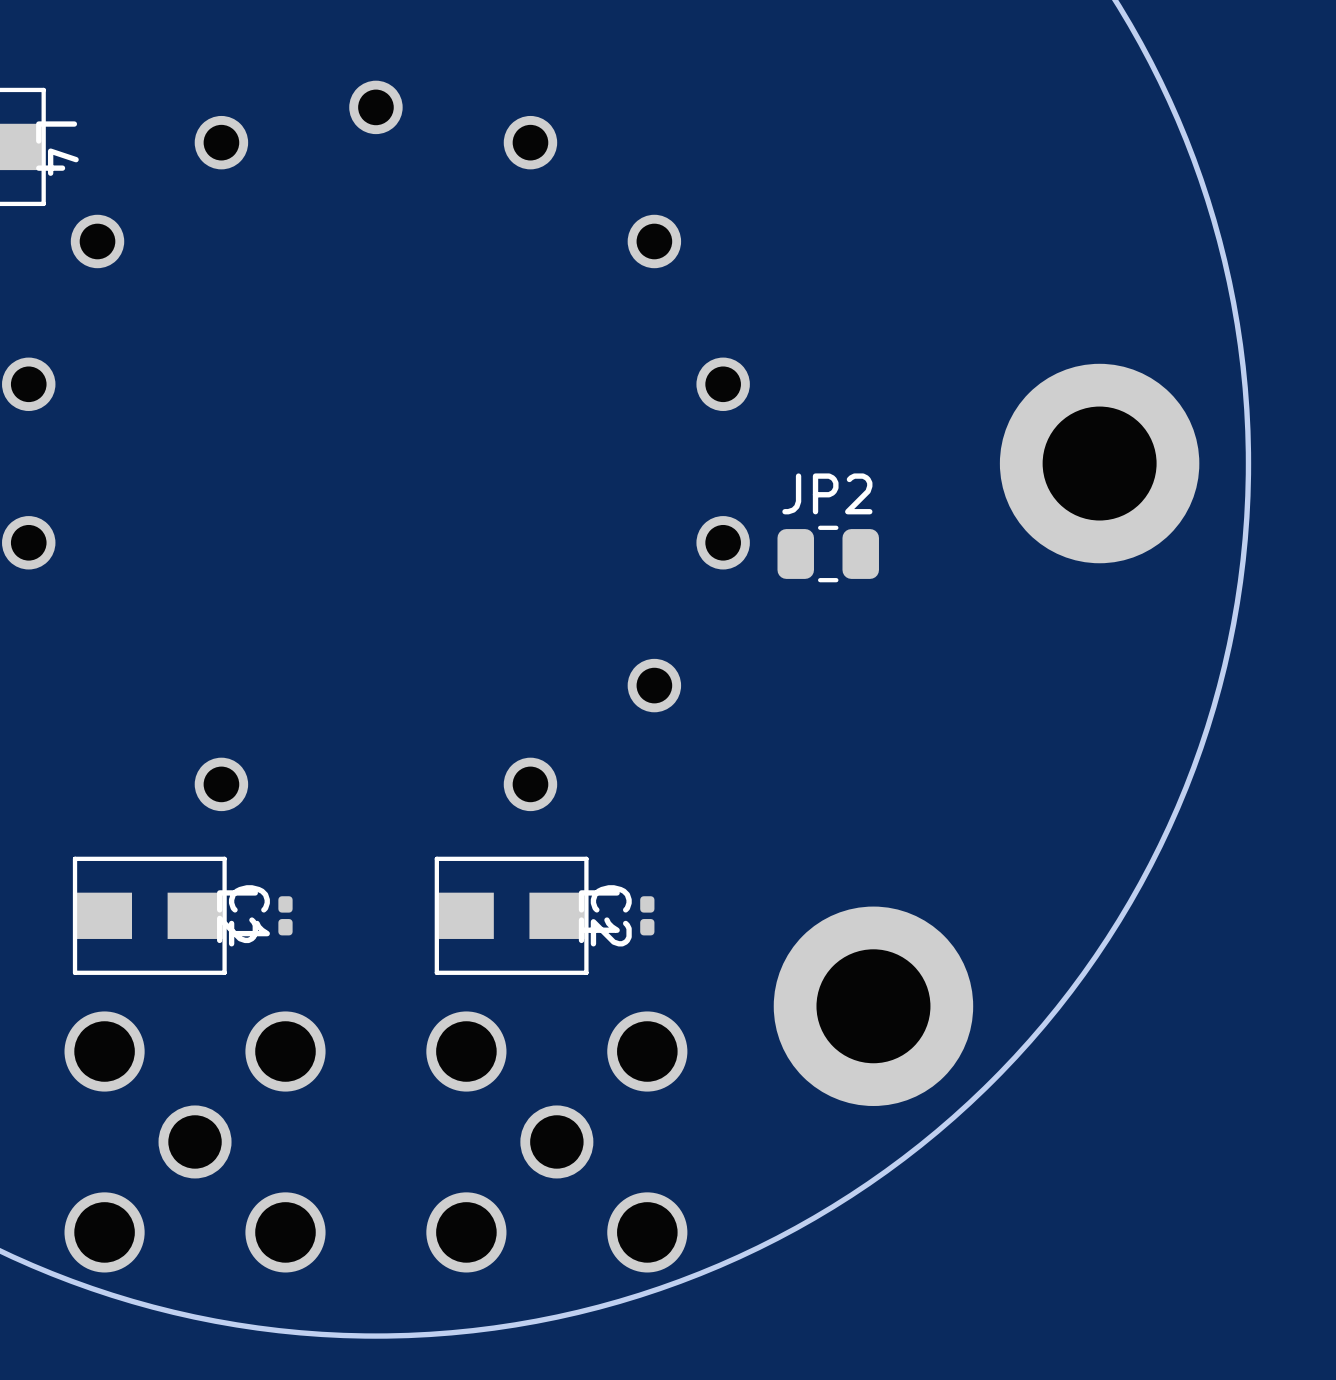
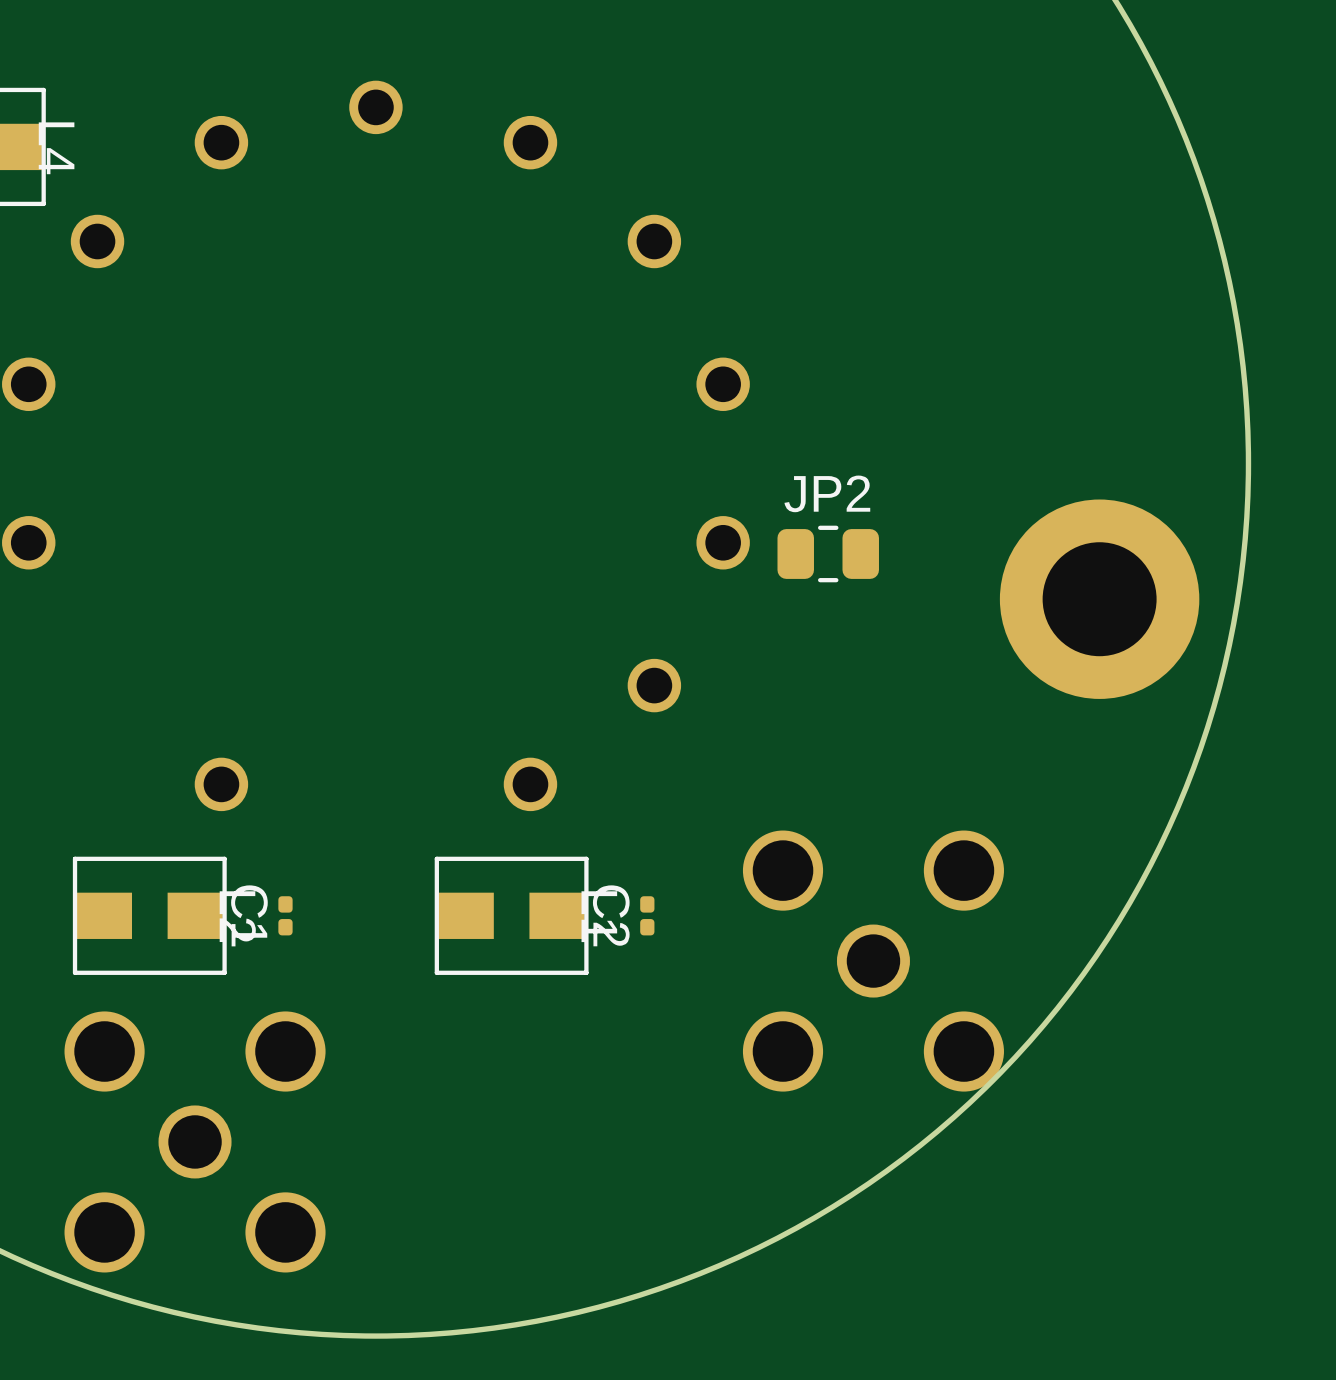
part position: (1099, 463) -> (1099, 599)
part: (873, 1006) -> none
part position: (556, 1141) -> (873, 961)

